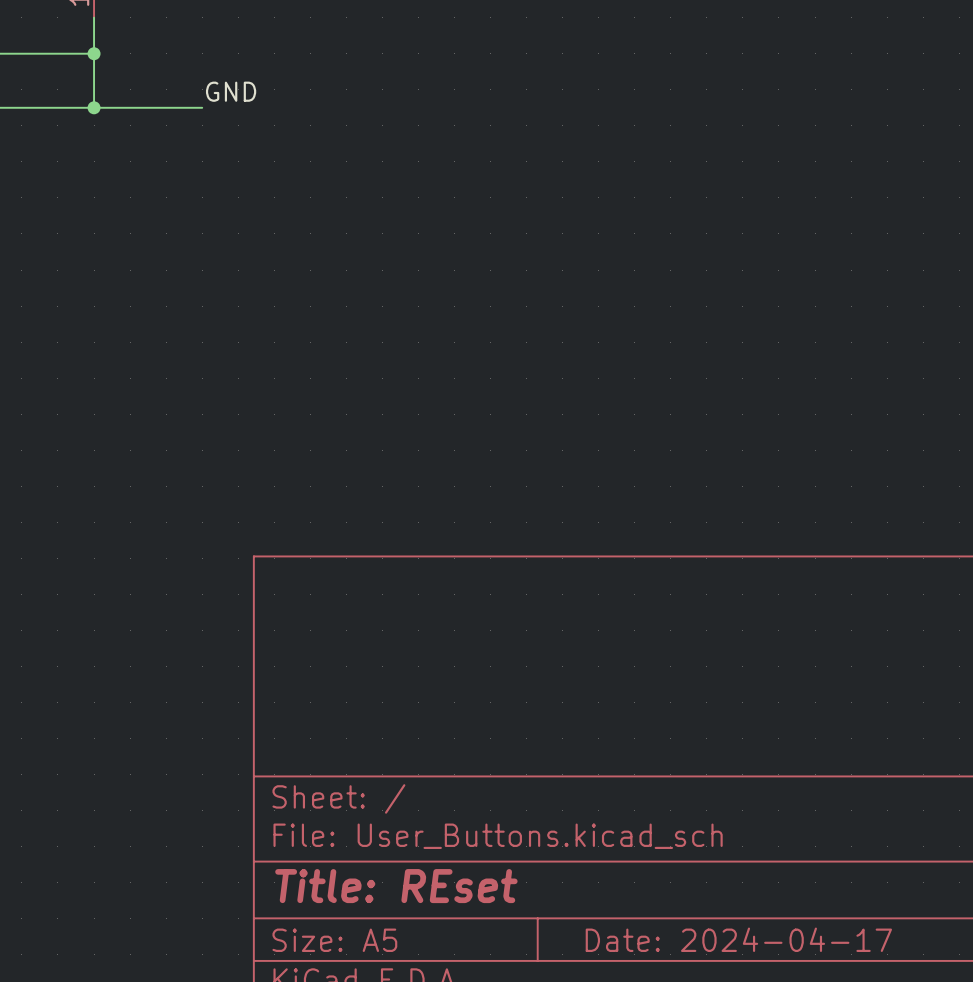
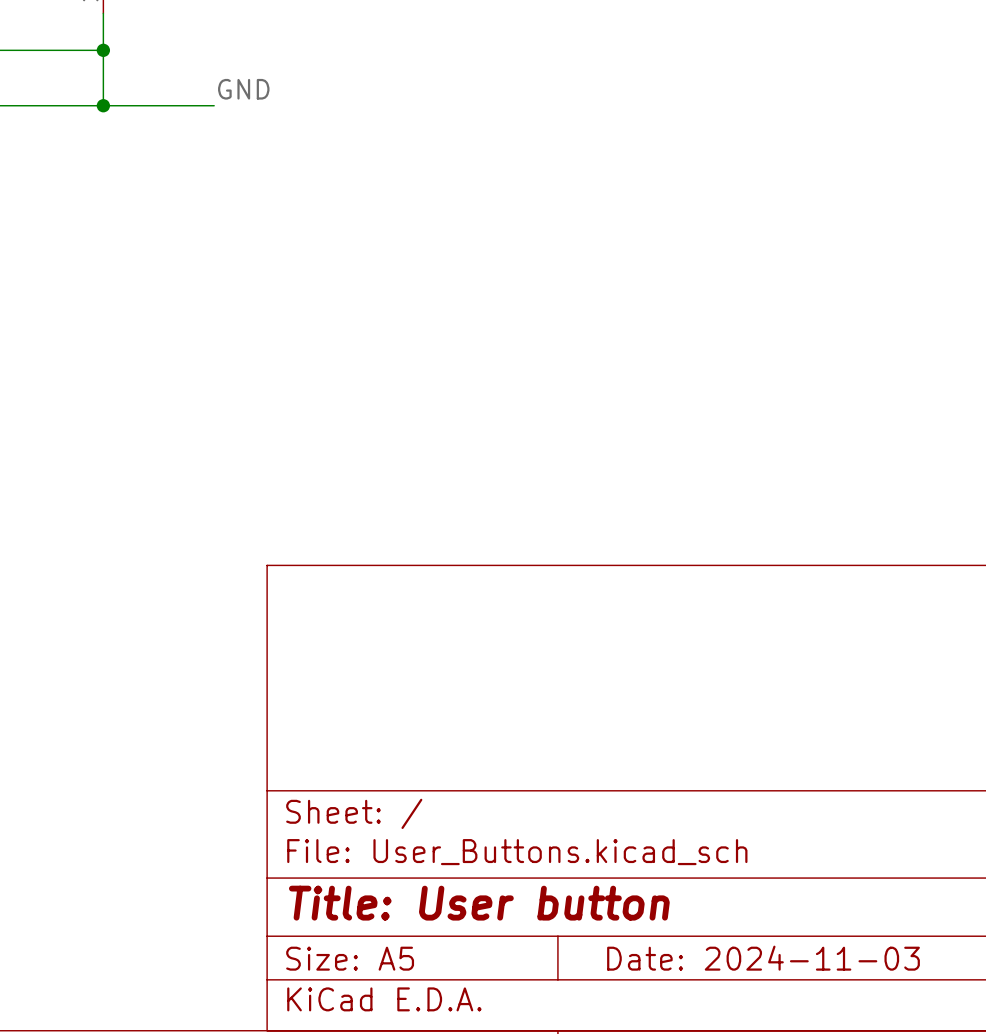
title block: Title: REset (396, 886) -> Title: User button (479, 903)
title block: Date: 2024-04-17 (738, 939) -> Date: 2024-11-03 (763, 958)

